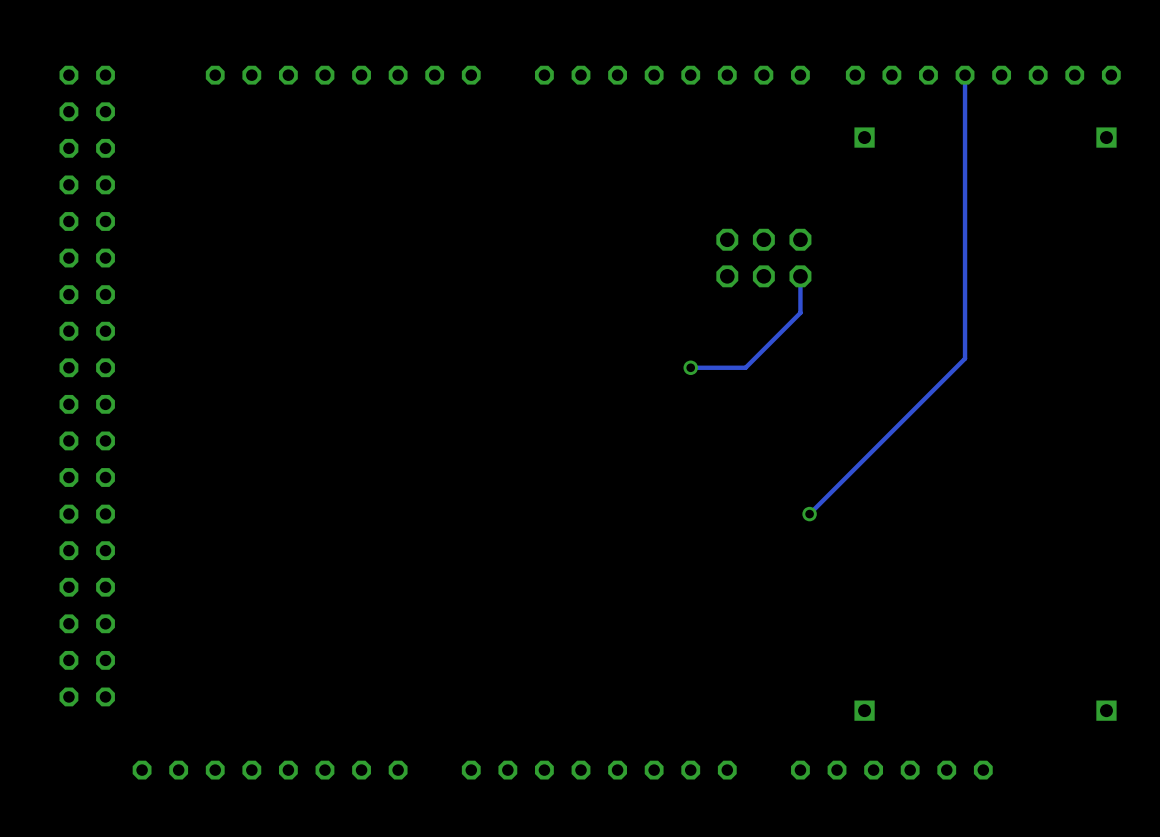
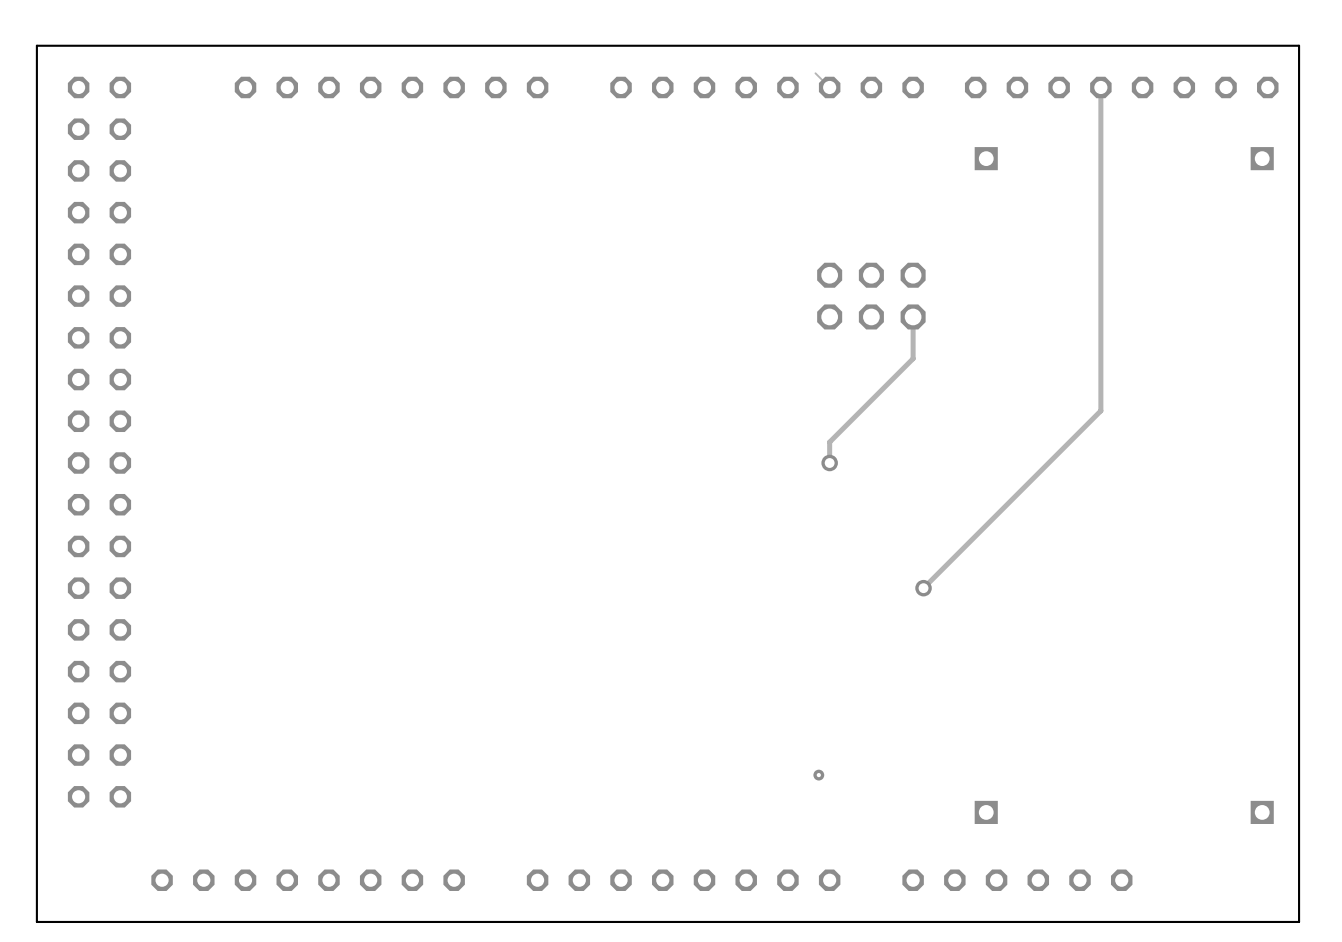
board edge: none -> (1299, 45) (36, 45) (36, 921) (1299, 921) (1299, 45)
track: none -> (815, 73) (829, 87)
via position: (690, 367) -> (829, 463)
track: (745, 367) (690, 367) -> (850, 421) (829, 442) (829, 463)
via: none -> (818, 775)

